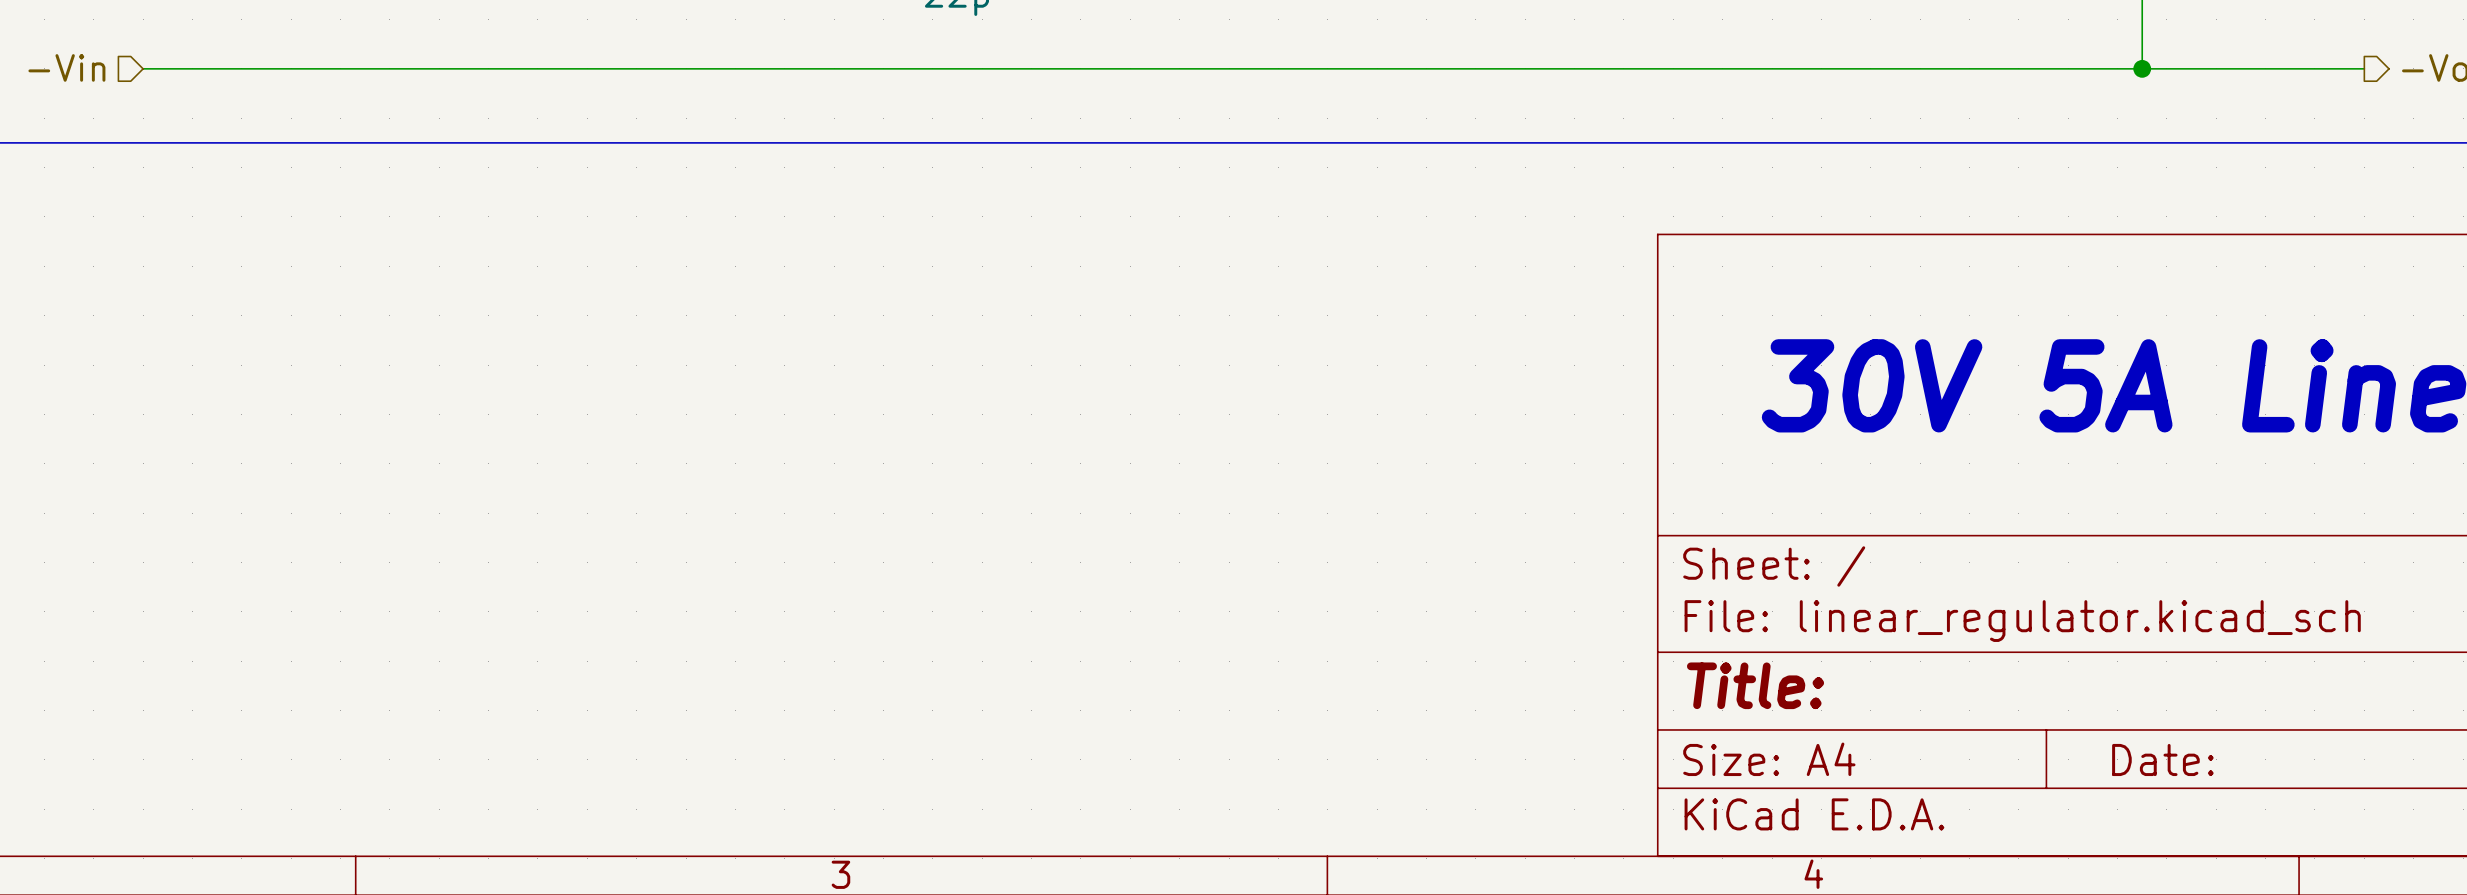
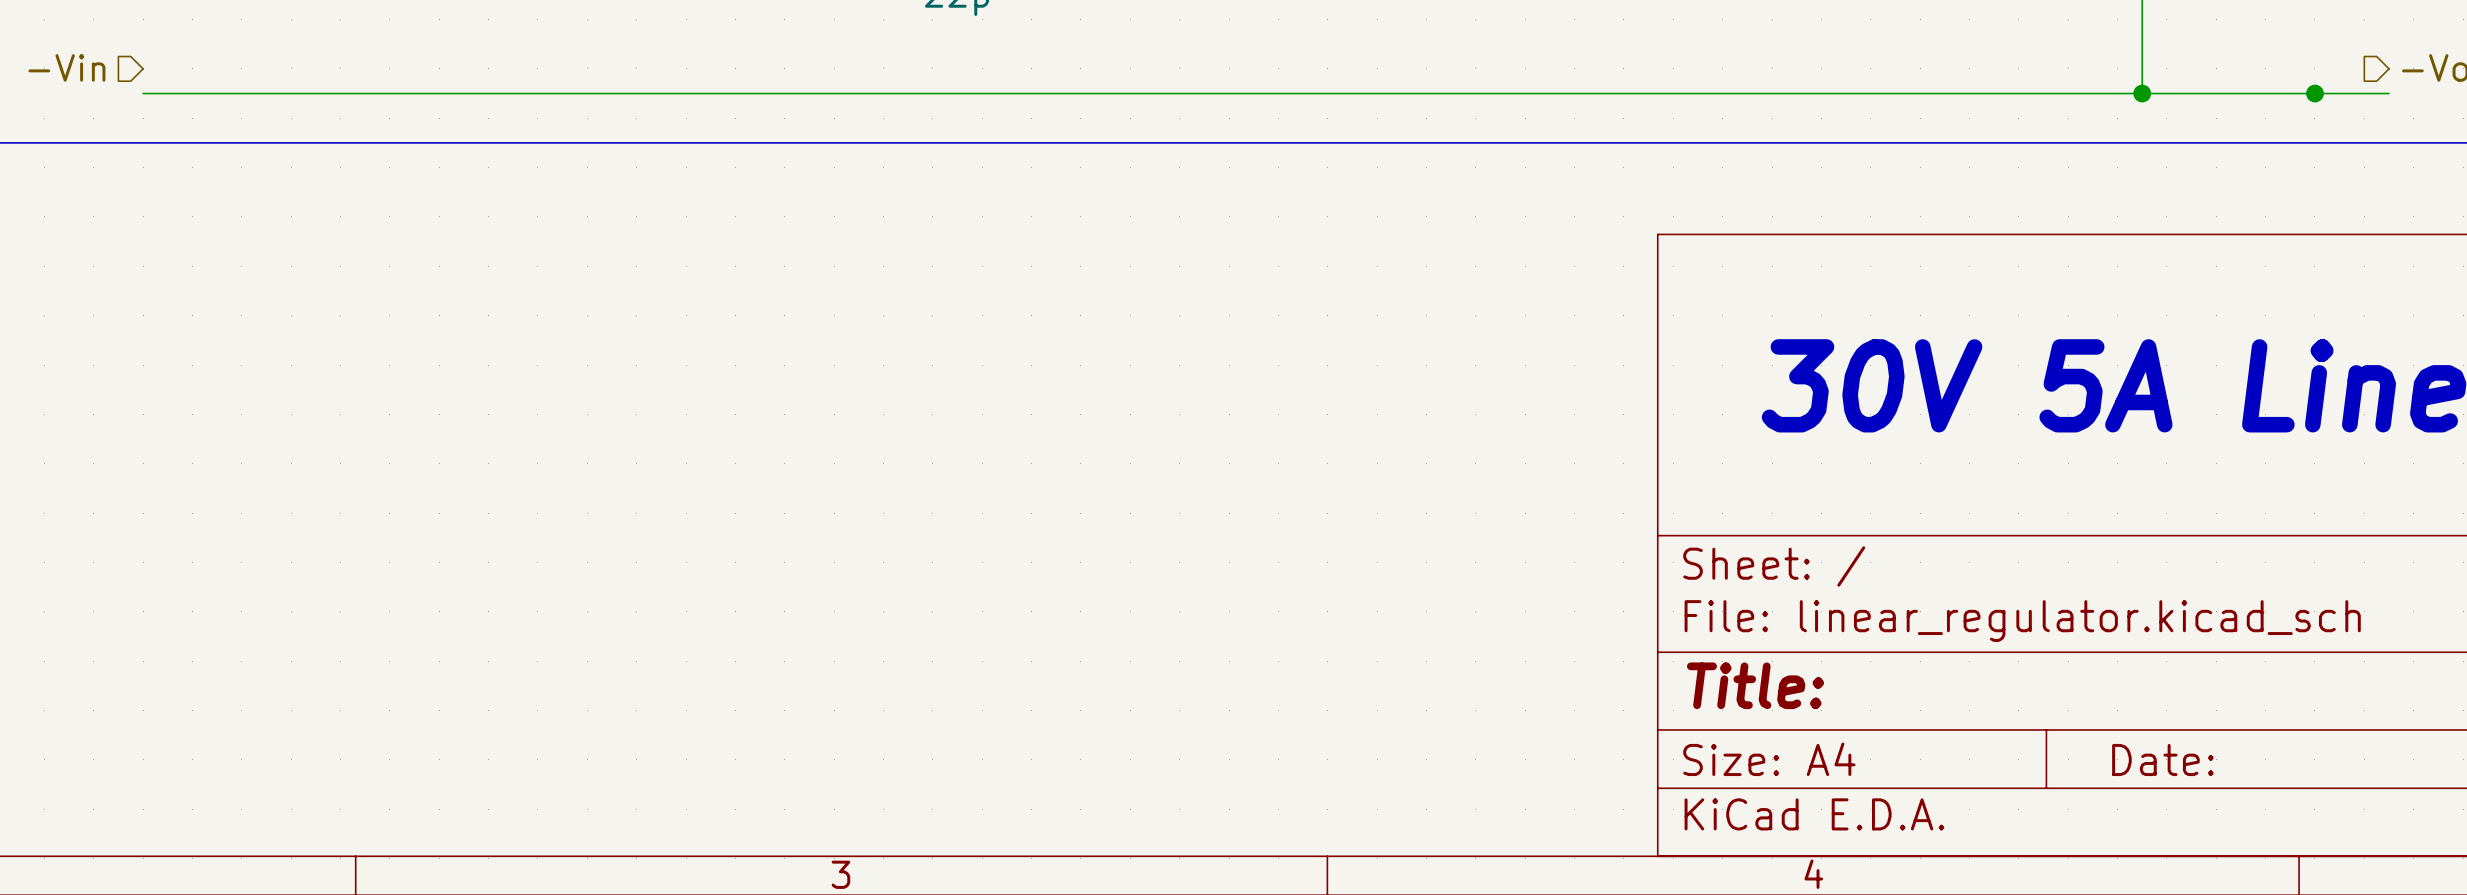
wire: (143, 68) (2364, 68) -> none
wire: none -> (2142, 68) (2142, 93)
junction position: (2142, 68) -> (2142, 93)
wire: none -> (143, 93) (2389, 93)
junction: none -> (2314, 93)

